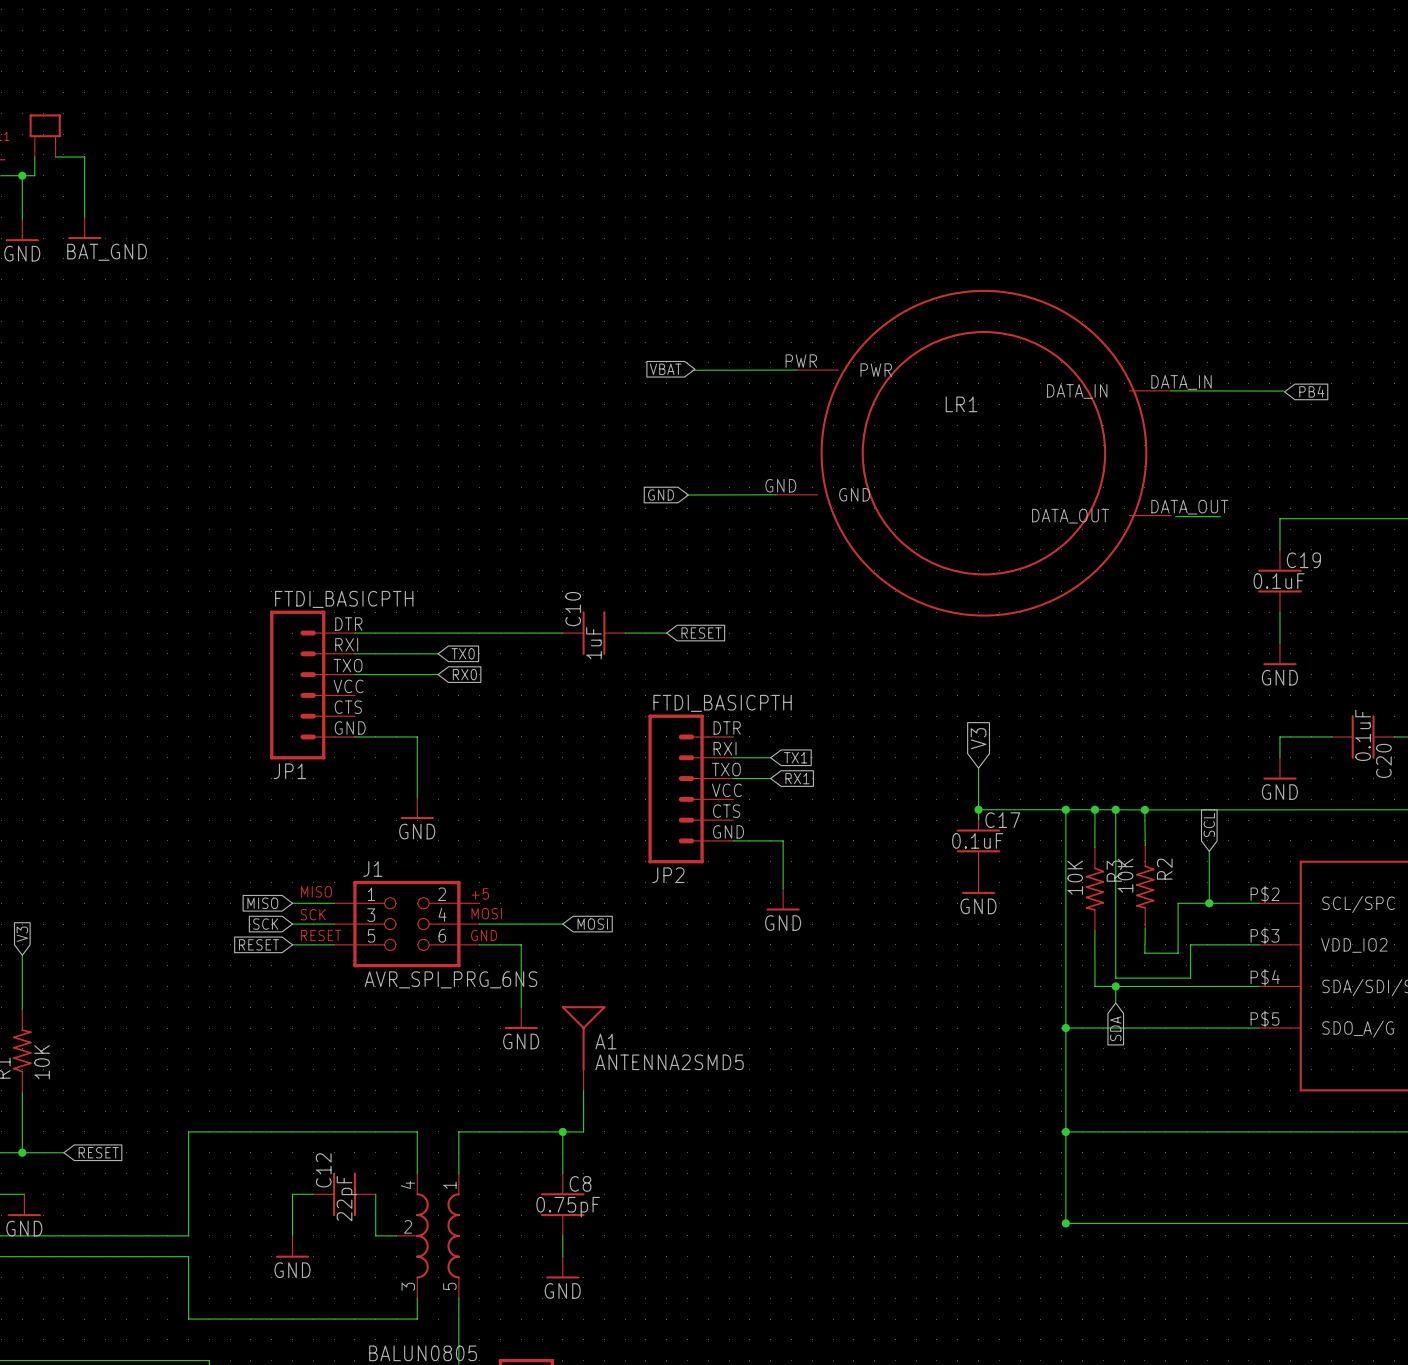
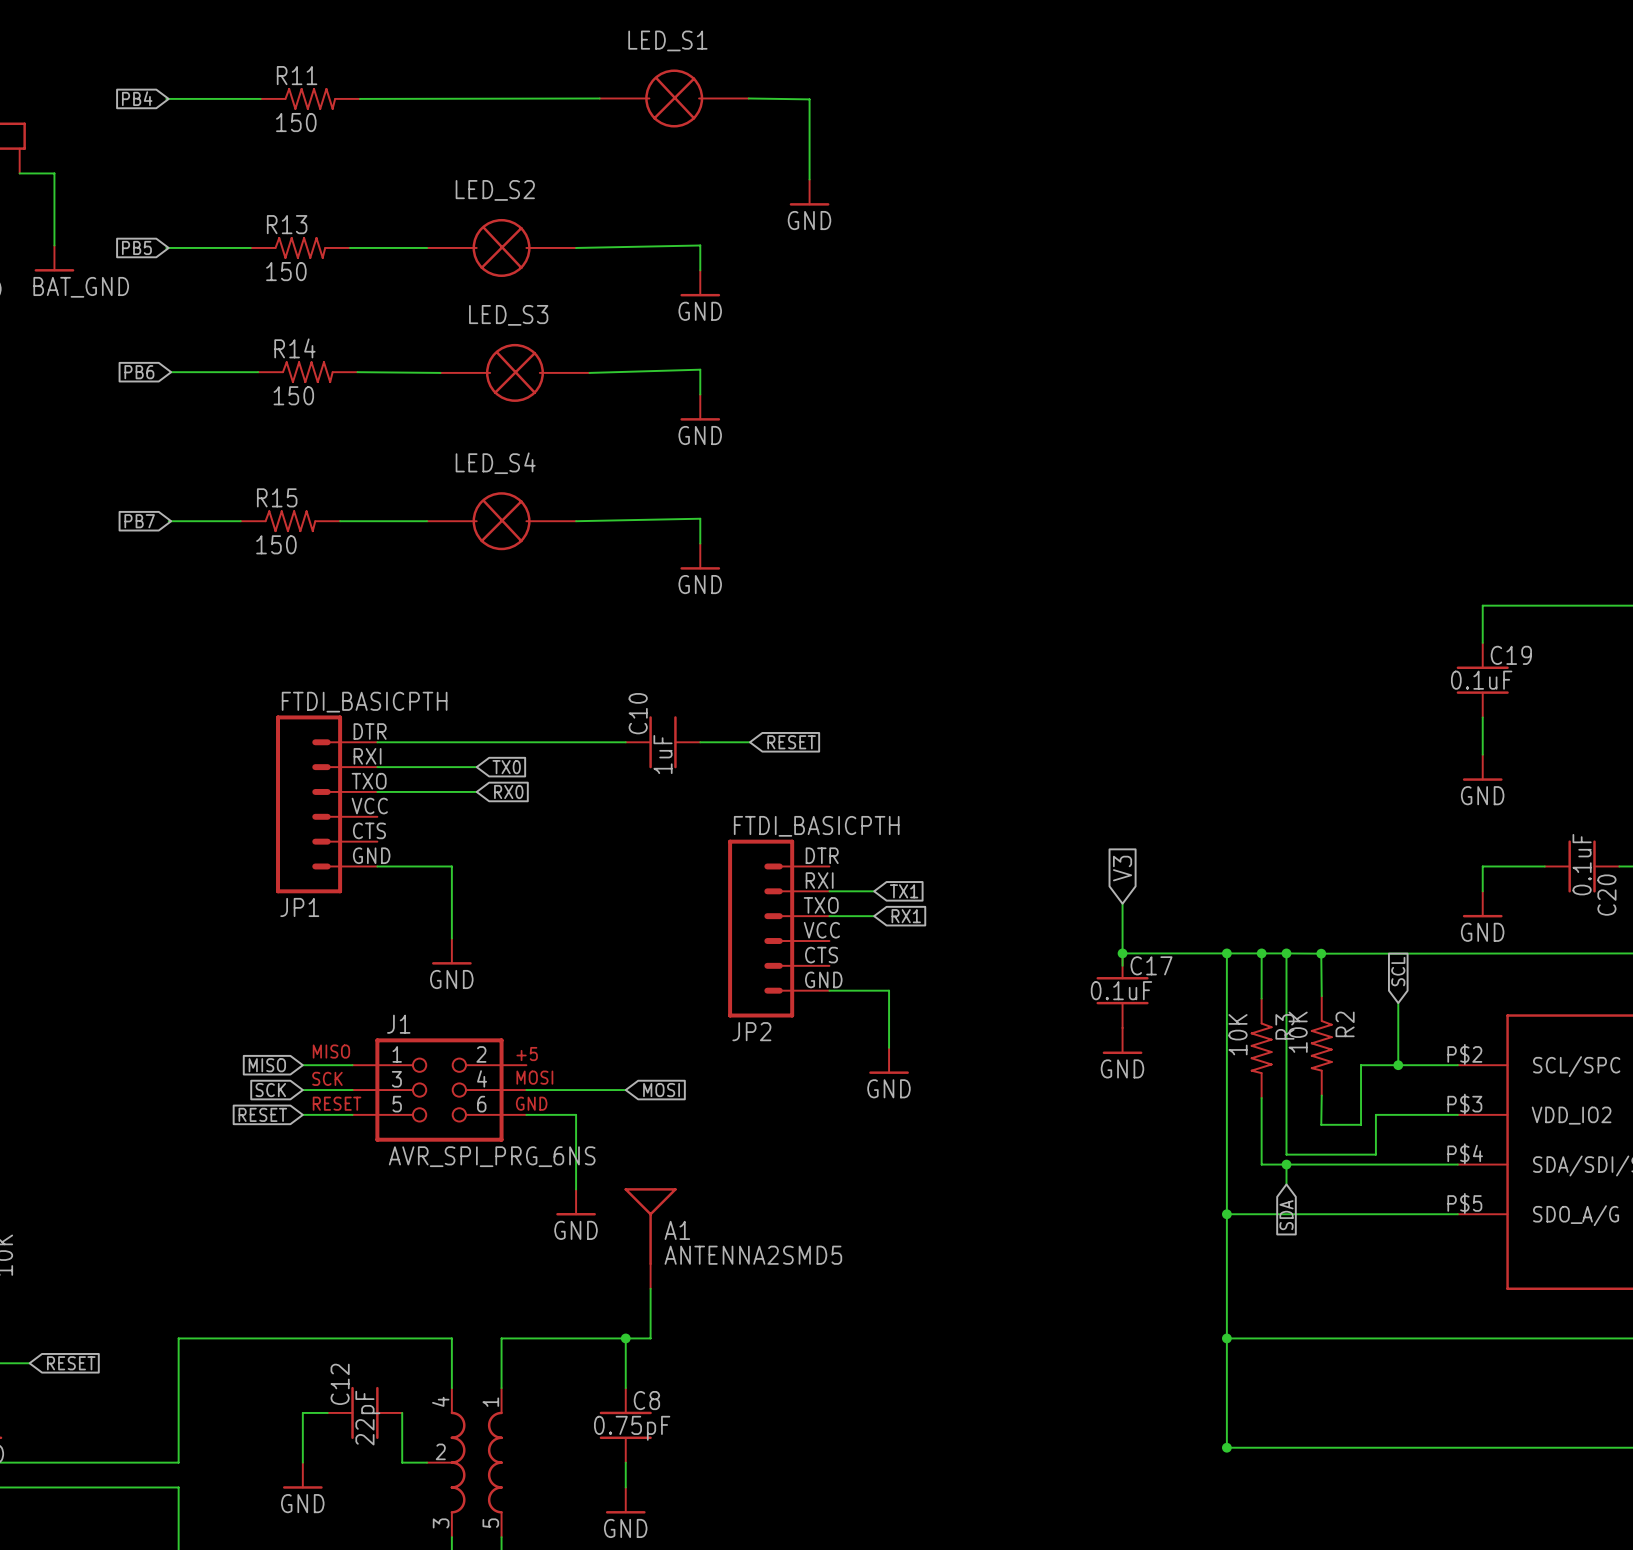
global label: none -> PB4 (137, 98)
wire: none -> (166, 98) (260, 98)
R11: none -> 150 (310, 98)
wire: none -> (599, 98) (359, 98)
LED_S1: none -> (674, 98)
wire: none -> (748, 98) (809, 99) (809, 179)
power symbol: none -> GND (809, 192)
global label: none -> PB5 (136, 247)
wire: none -> (166, 247) (250, 247)
R13: none -> 150 (300, 247)
wire: none -> (350, 247) (427, 247)
LED_S2: none -> (501, 247)
wire: none -> (576, 247) (700, 245) (700, 270)
power symbol: none -> GND (700, 283)
global label: none -> PB6 (139, 372)
wire: none -> (171, 372) (258, 372)
R14: none -> 150 (307, 372)
wire: none -> (357, 372) (440, 372)
LED_S3: none -> (514, 372)
wire: none -> (589, 372) (700, 369) (700, 394)
power symbol: none -> GND (700, 407)
global label: VBAT (665, 369) -> none
wire: (796, 370) (692, 370) -> none
wire: (1171, 390) (1283, 391) -> none
global label: PB4 (1311, 391) -> none
global label: none -> PB7 (139, 521)
wire: none -> (168, 521) (240, 521)
R15: none -> 150 (290, 521)
wire: none -> (340, 521) (427, 521)
LED_S4: none -> (501, 521)
wire: none -> (576, 521) (700, 518) (700, 543)
LR1: (973, 453) -> none
power symbol: none -> GND (700, 556)
wire: (776, 494) (686, 495) -> none
global label: GND (661, 495) -> none
wire: (1175, 516) (1220, 516) -> none

